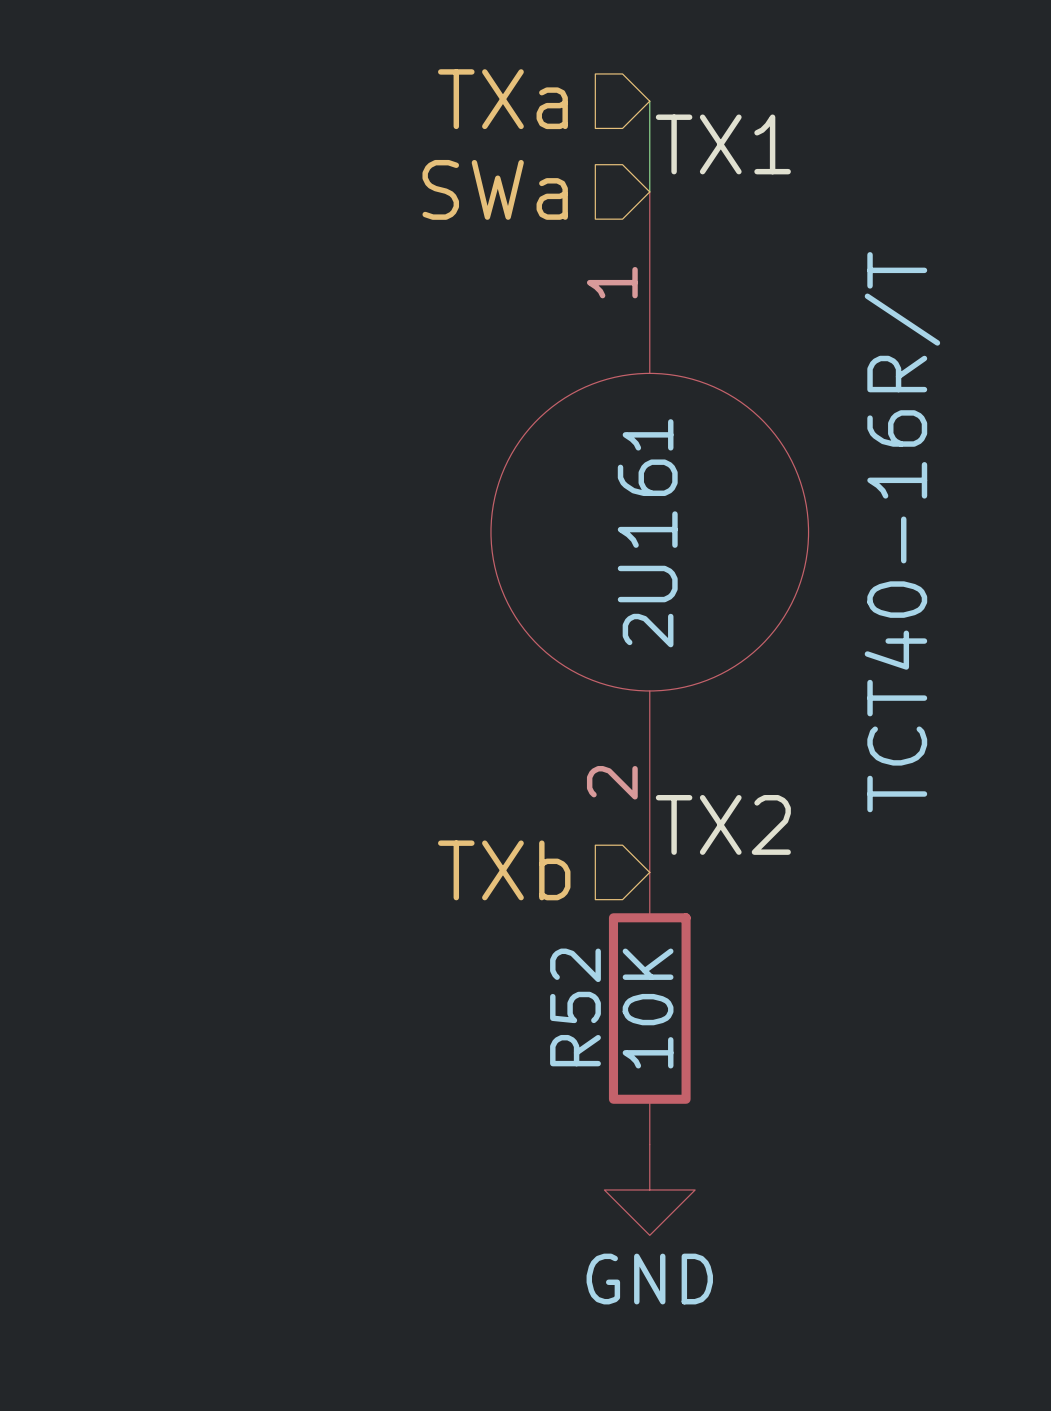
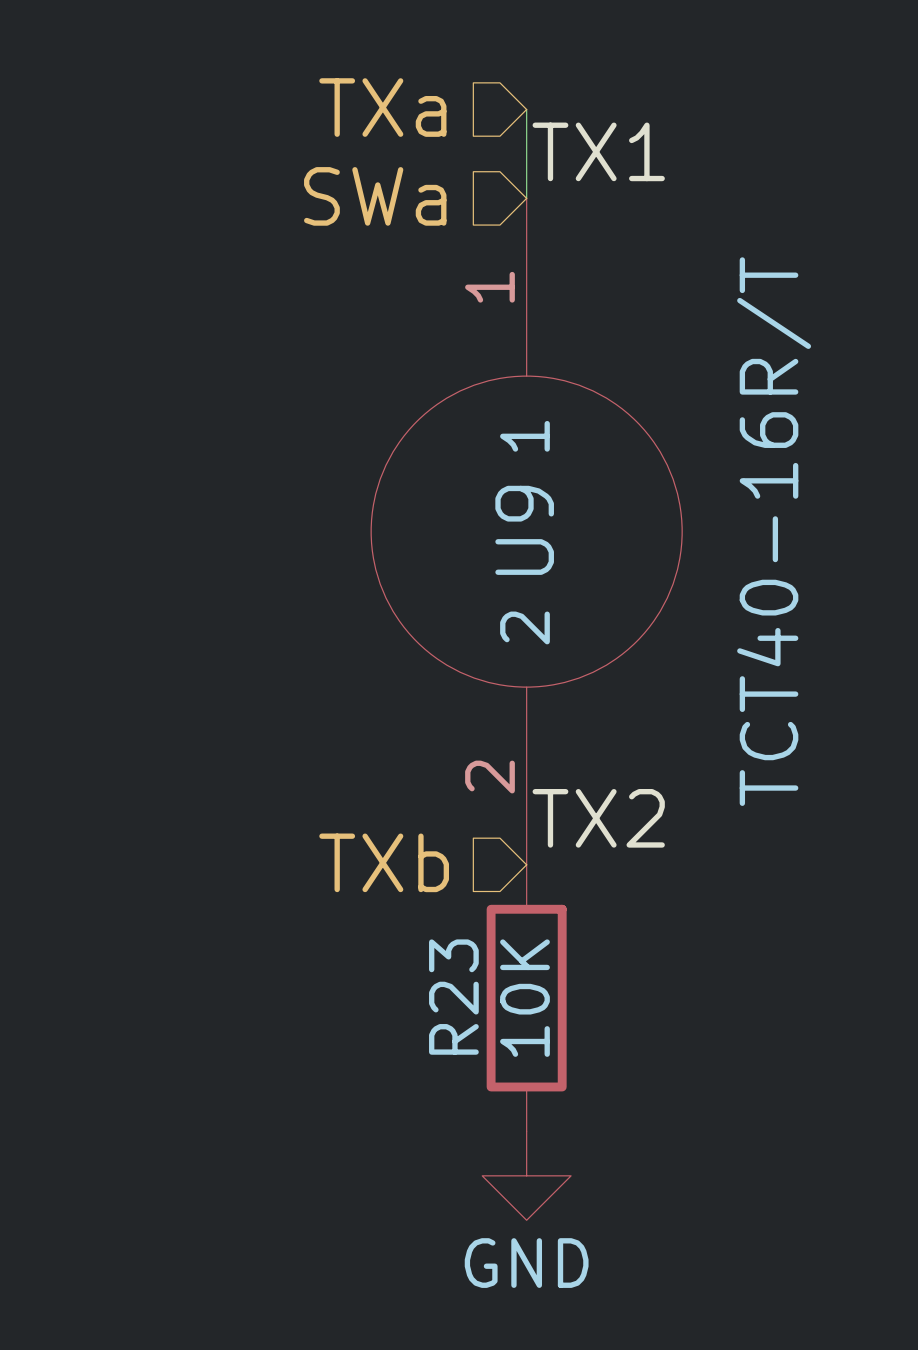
U16 name: U16 (647, 530) -> U9 (524, 530)
R52 name: R52 (575, 1007) -> R23 (453, 997)

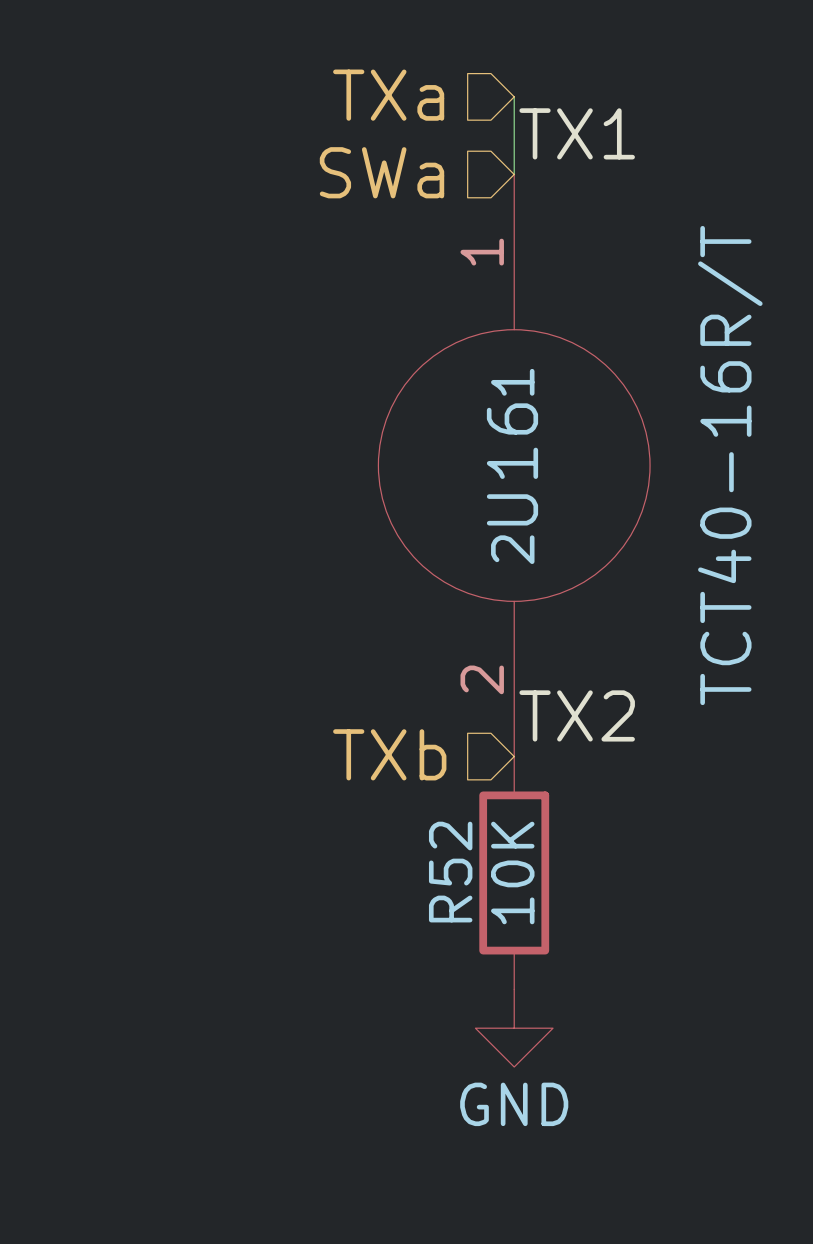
U9 name: U9 (524, 530) -> U16 (512, 464)
R23 name: R23 (453, 997) -> R52 (450, 872)

